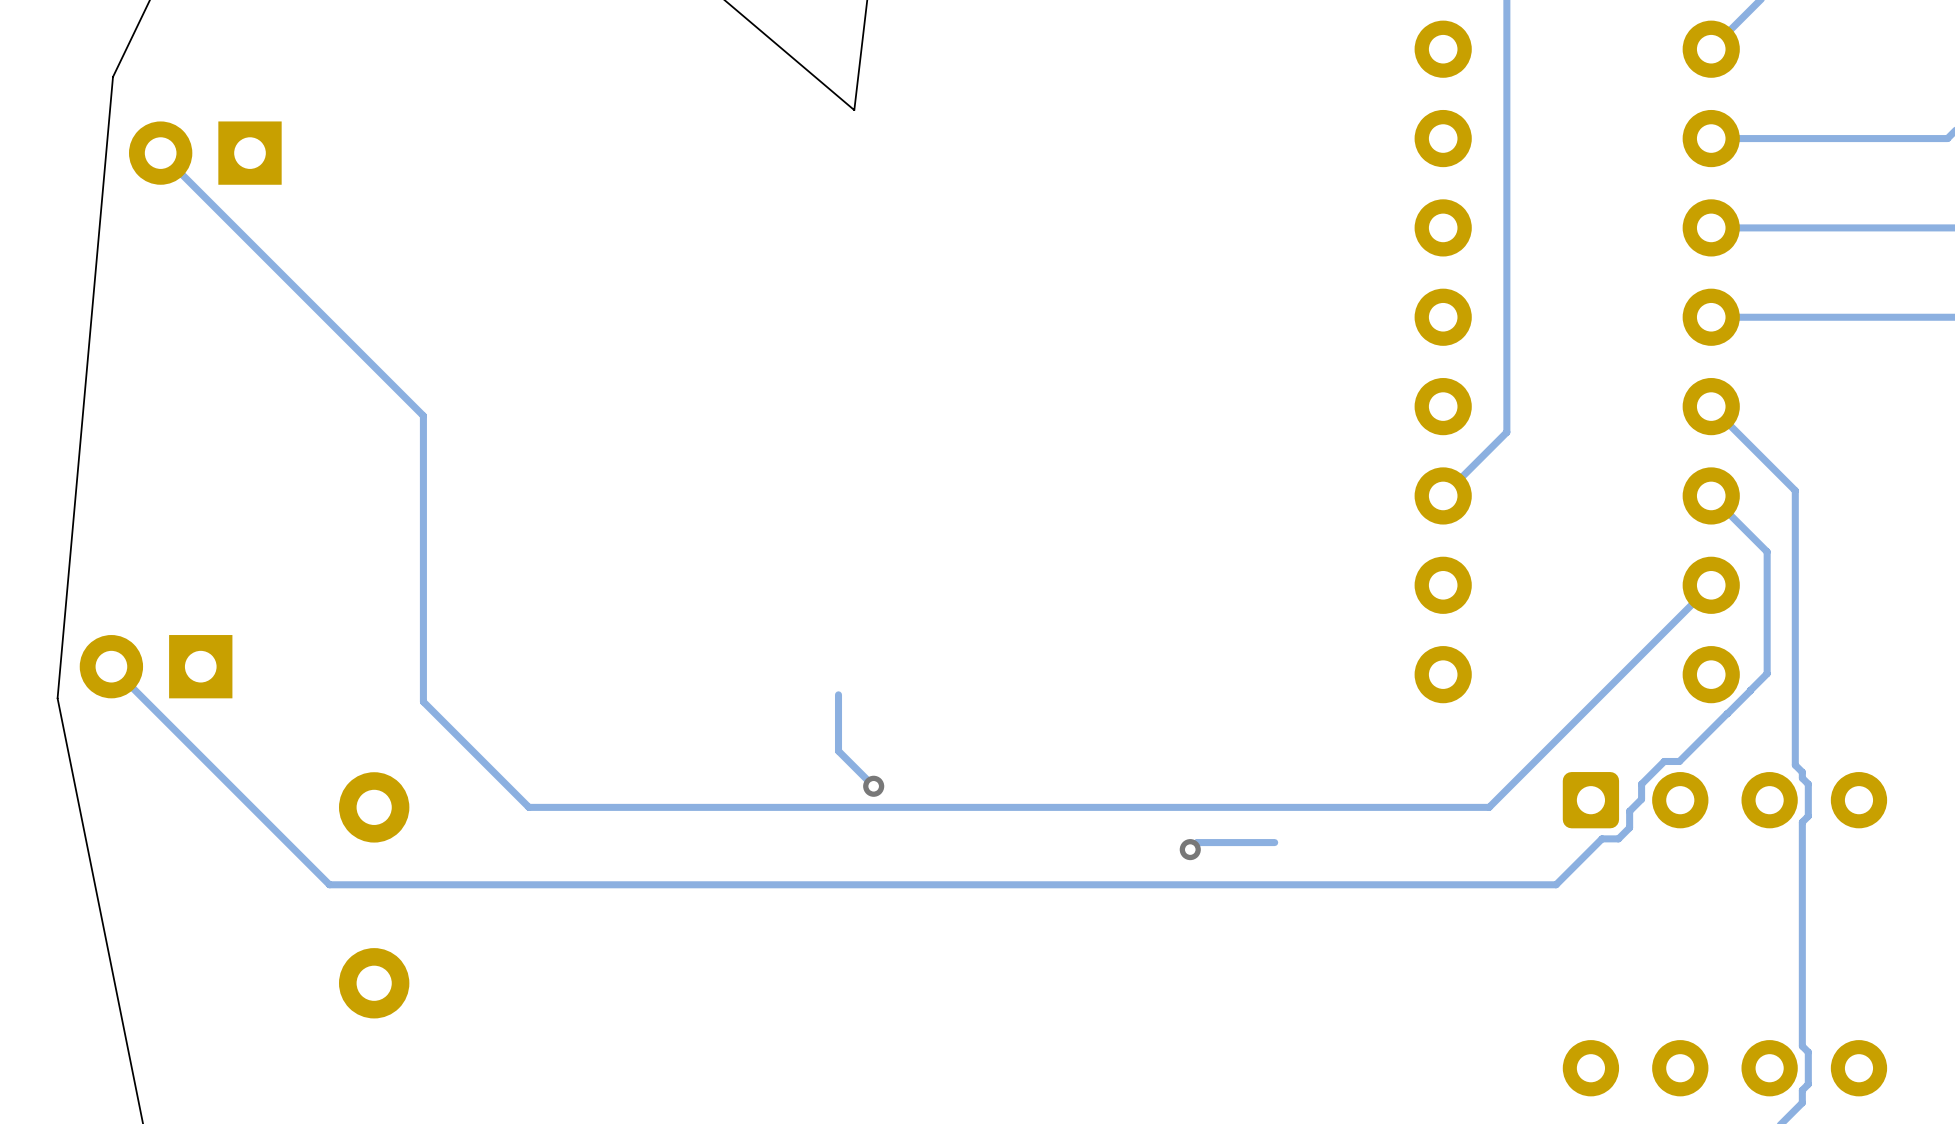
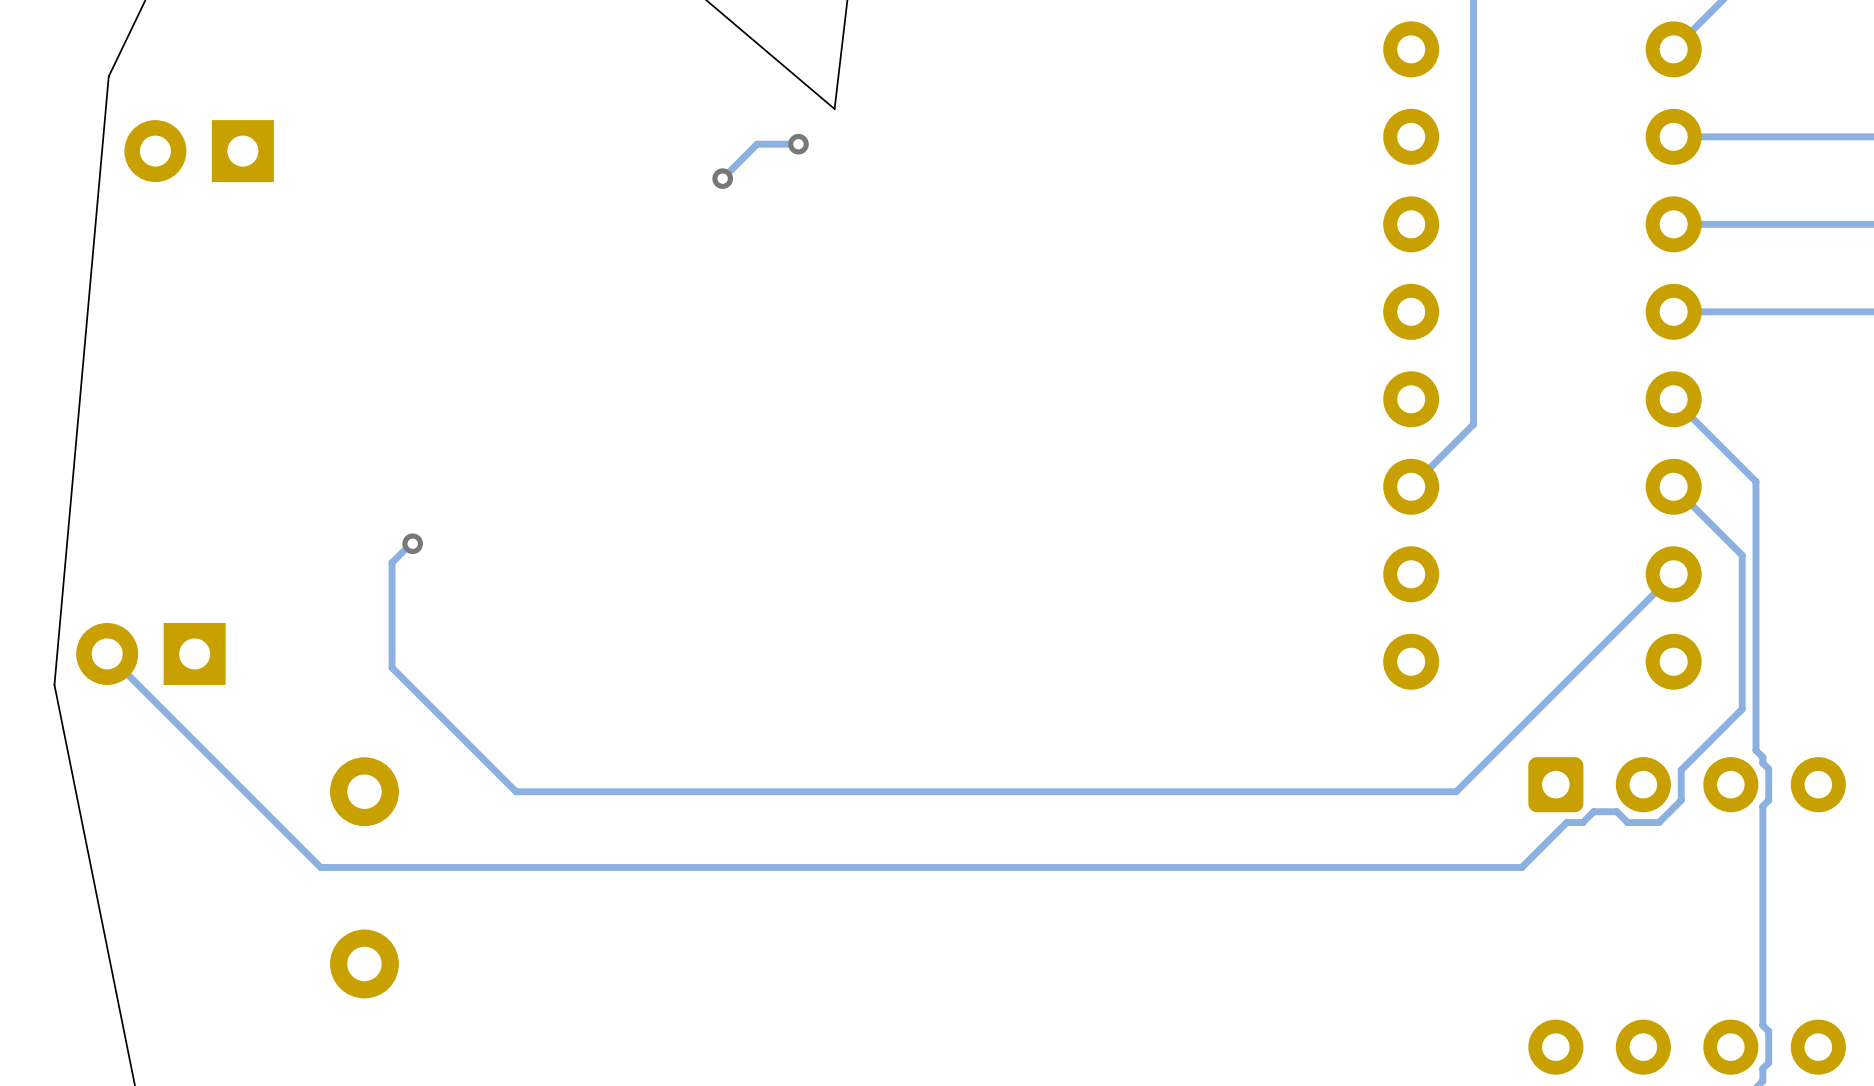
track: none -> (798, 144) (757, 144) (722, 178)
via: none -> (798, 144)
track: (160, 153) (423, 415) (423, 701) -> (412, 543) (392, 562) (392, 667) (412, 688)
via: none -> (722, 178)
track: (1767, 551) (1767, 673) (1679, 761) (1664, 761) (1641, 784) (1641, 799) (1629, 811) (1629, 827) -> (1728, 541) (1742, 555) (1742, 709) (1681, 770) (1681, 800) (1659, 822) (1627, 822) (1616, 811) (1593, 811)
via: none -> (412, 543)
track: (838, 694) (838, 751) (873, 786) -> none
via: (873, 786) -> none
track: (1274, 842) (1197, 842) (1190, 849) -> none
via: (1190, 849) -> none

